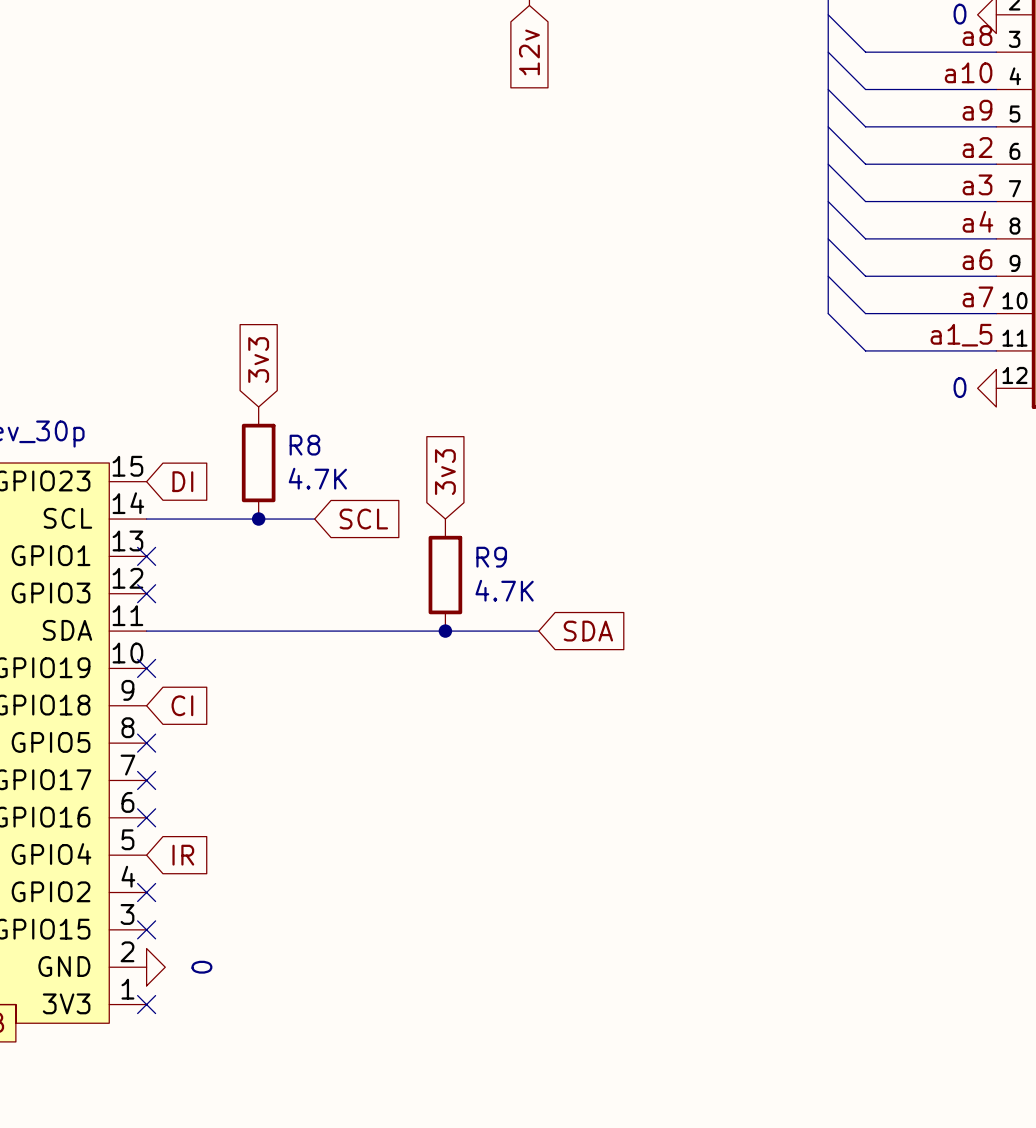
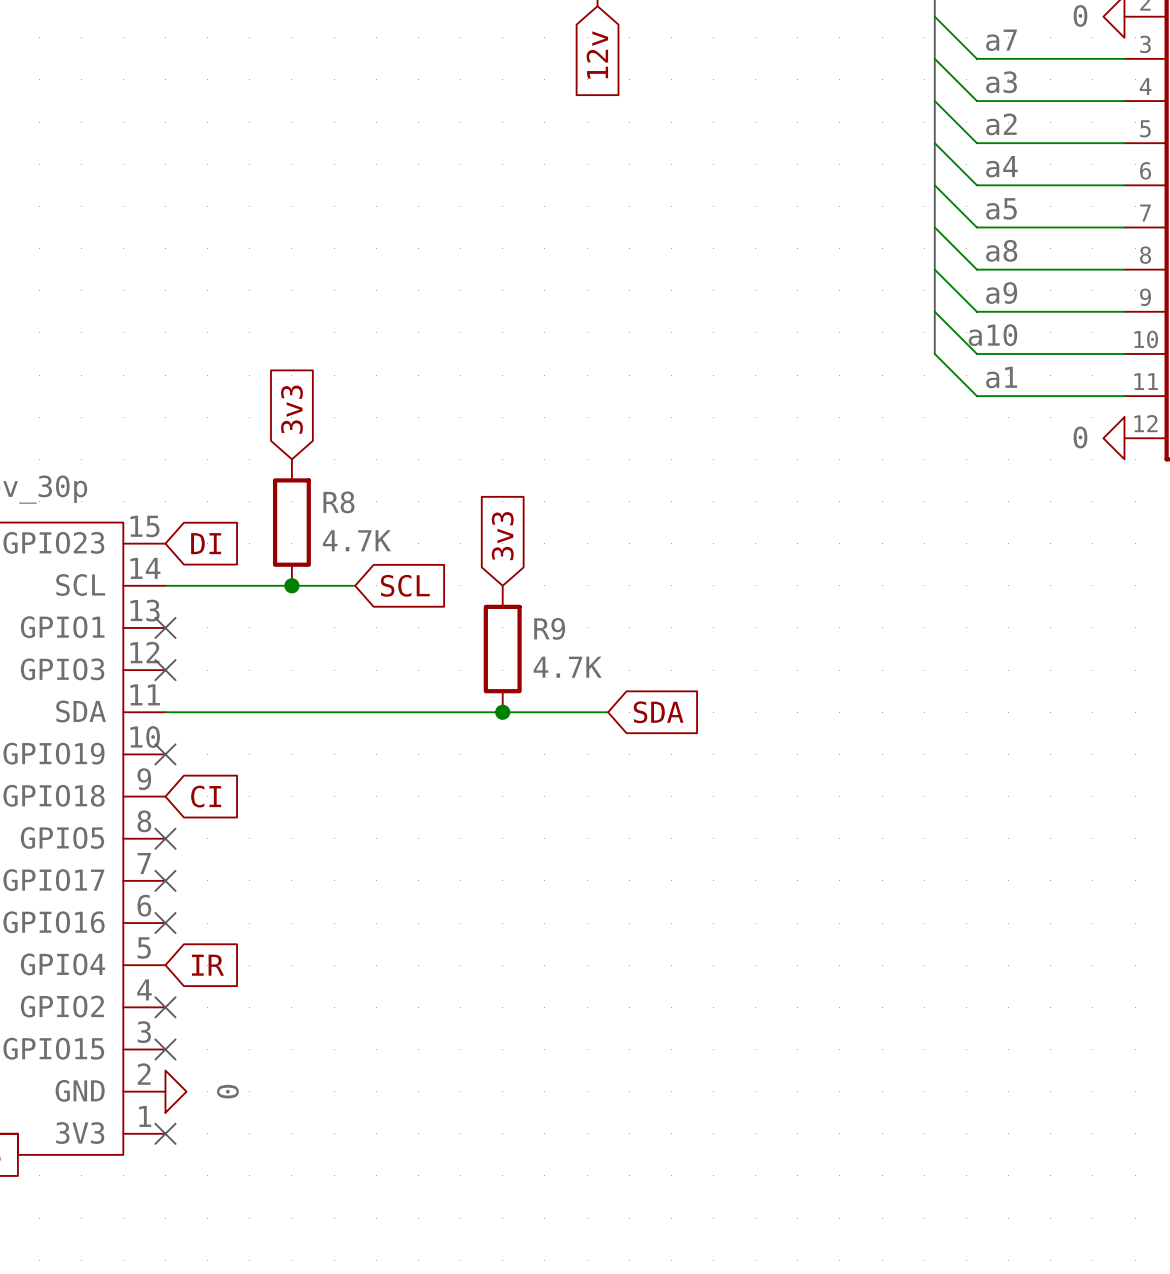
label position: a8 (977, 35) -> a8 (1001, 250)
label position: a10 (968, 72) -> a10 (992, 335)
label position: a9 (977, 110) -> a9 (1001, 293)
label position: a2 (977, 147) -> a2 (1001, 124)
label: none -> a5 (1001, 208)
label position: a3 (977, 184) -> a3 (1001, 82)
label position: a4 (977, 221) -> a4 (1001, 166)
label: a6 (977, 259) -> none
label position: a7 (977, 296) -> a7 (1001, 40)
label: none -> a1 (1001, 377)
label: a1_5 (961, 335) -> none

